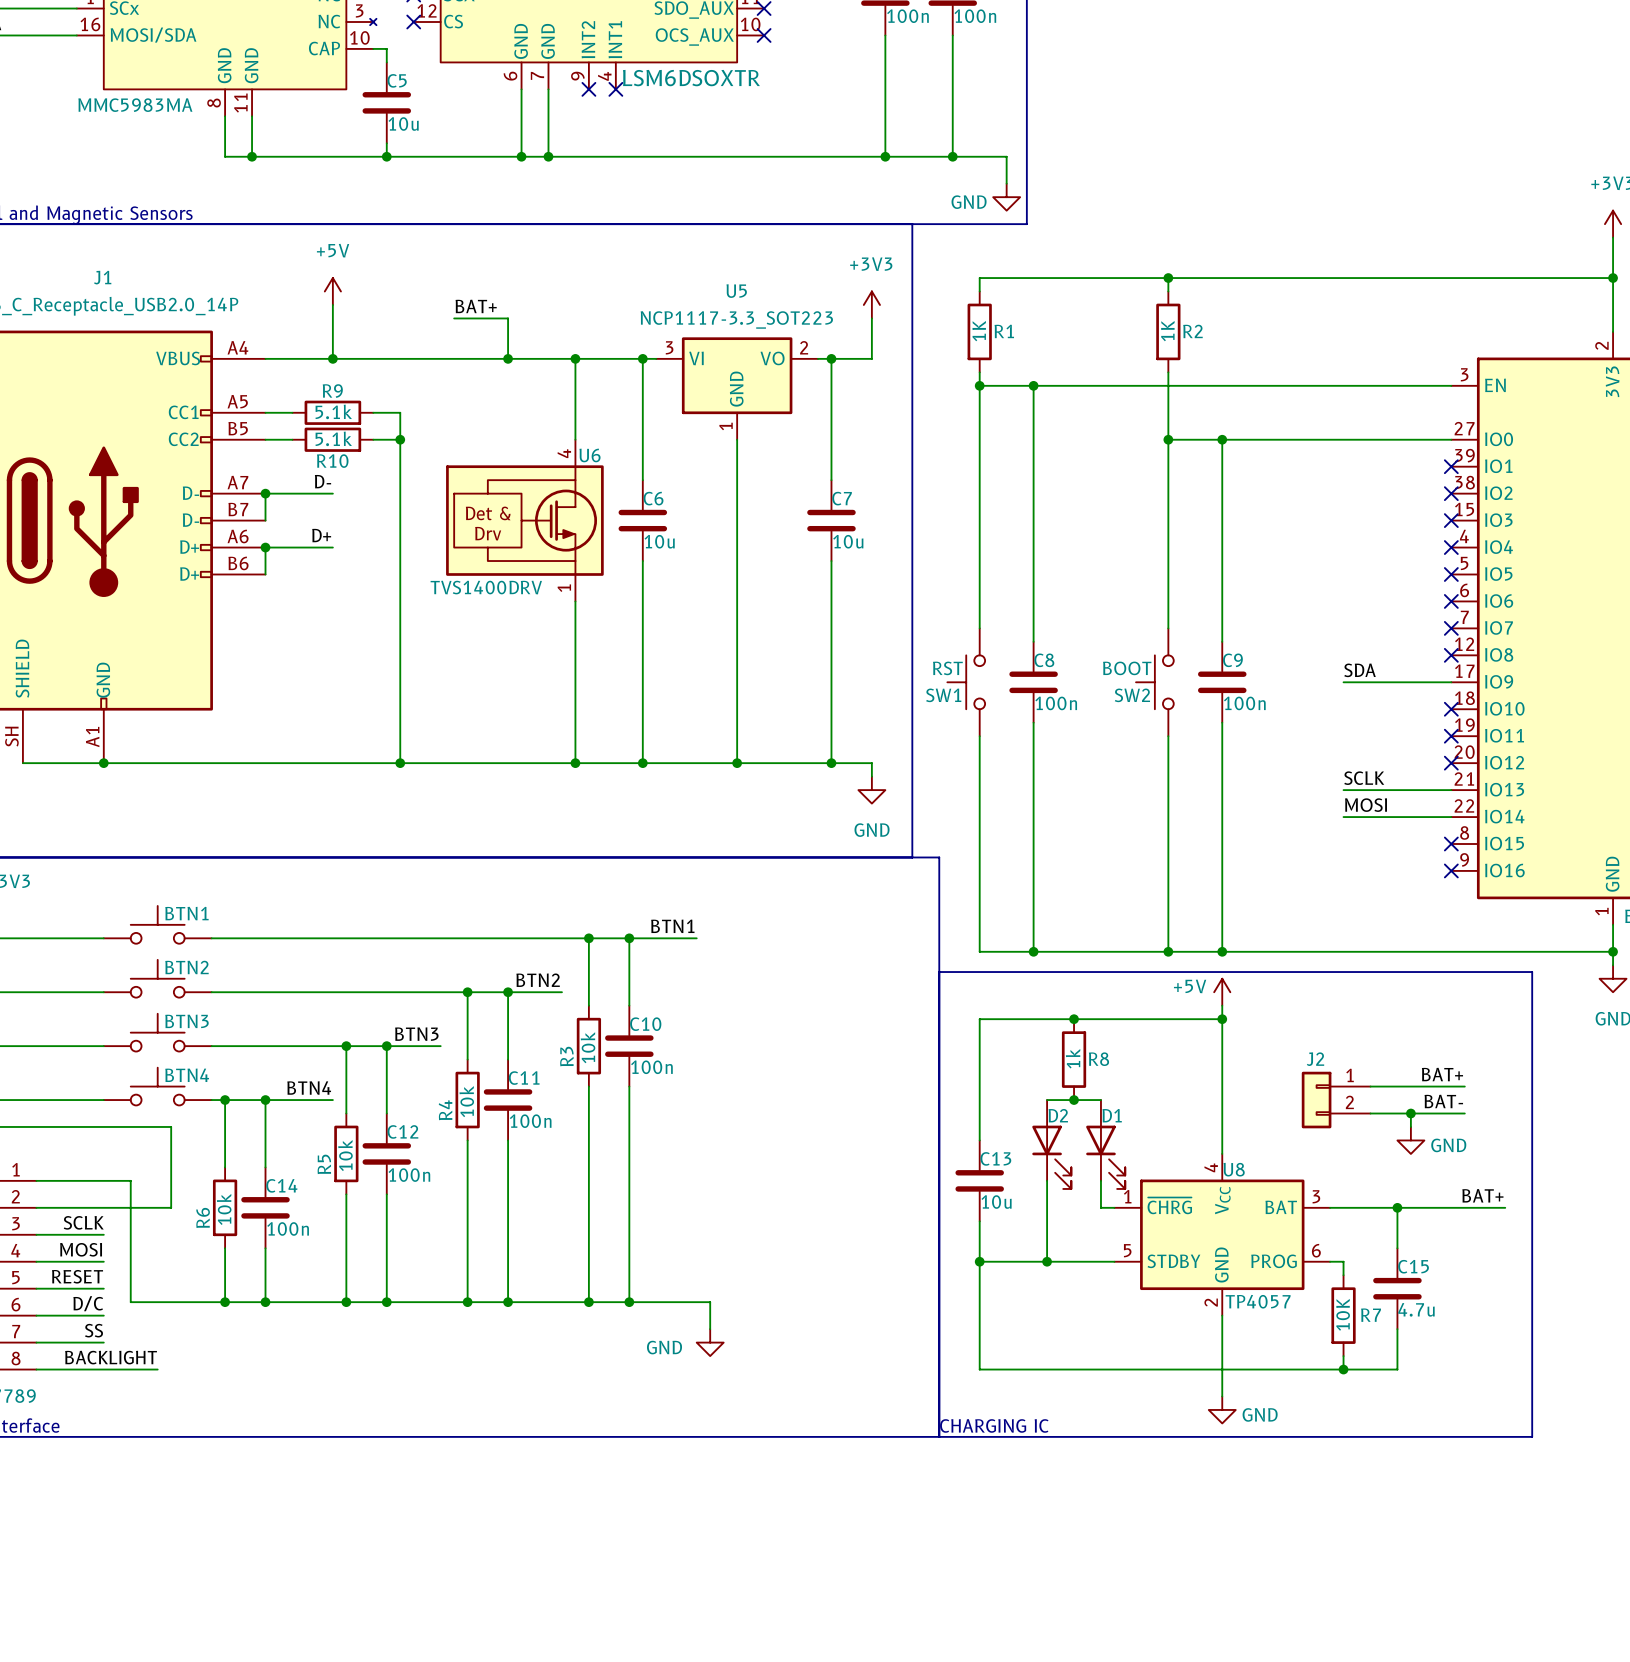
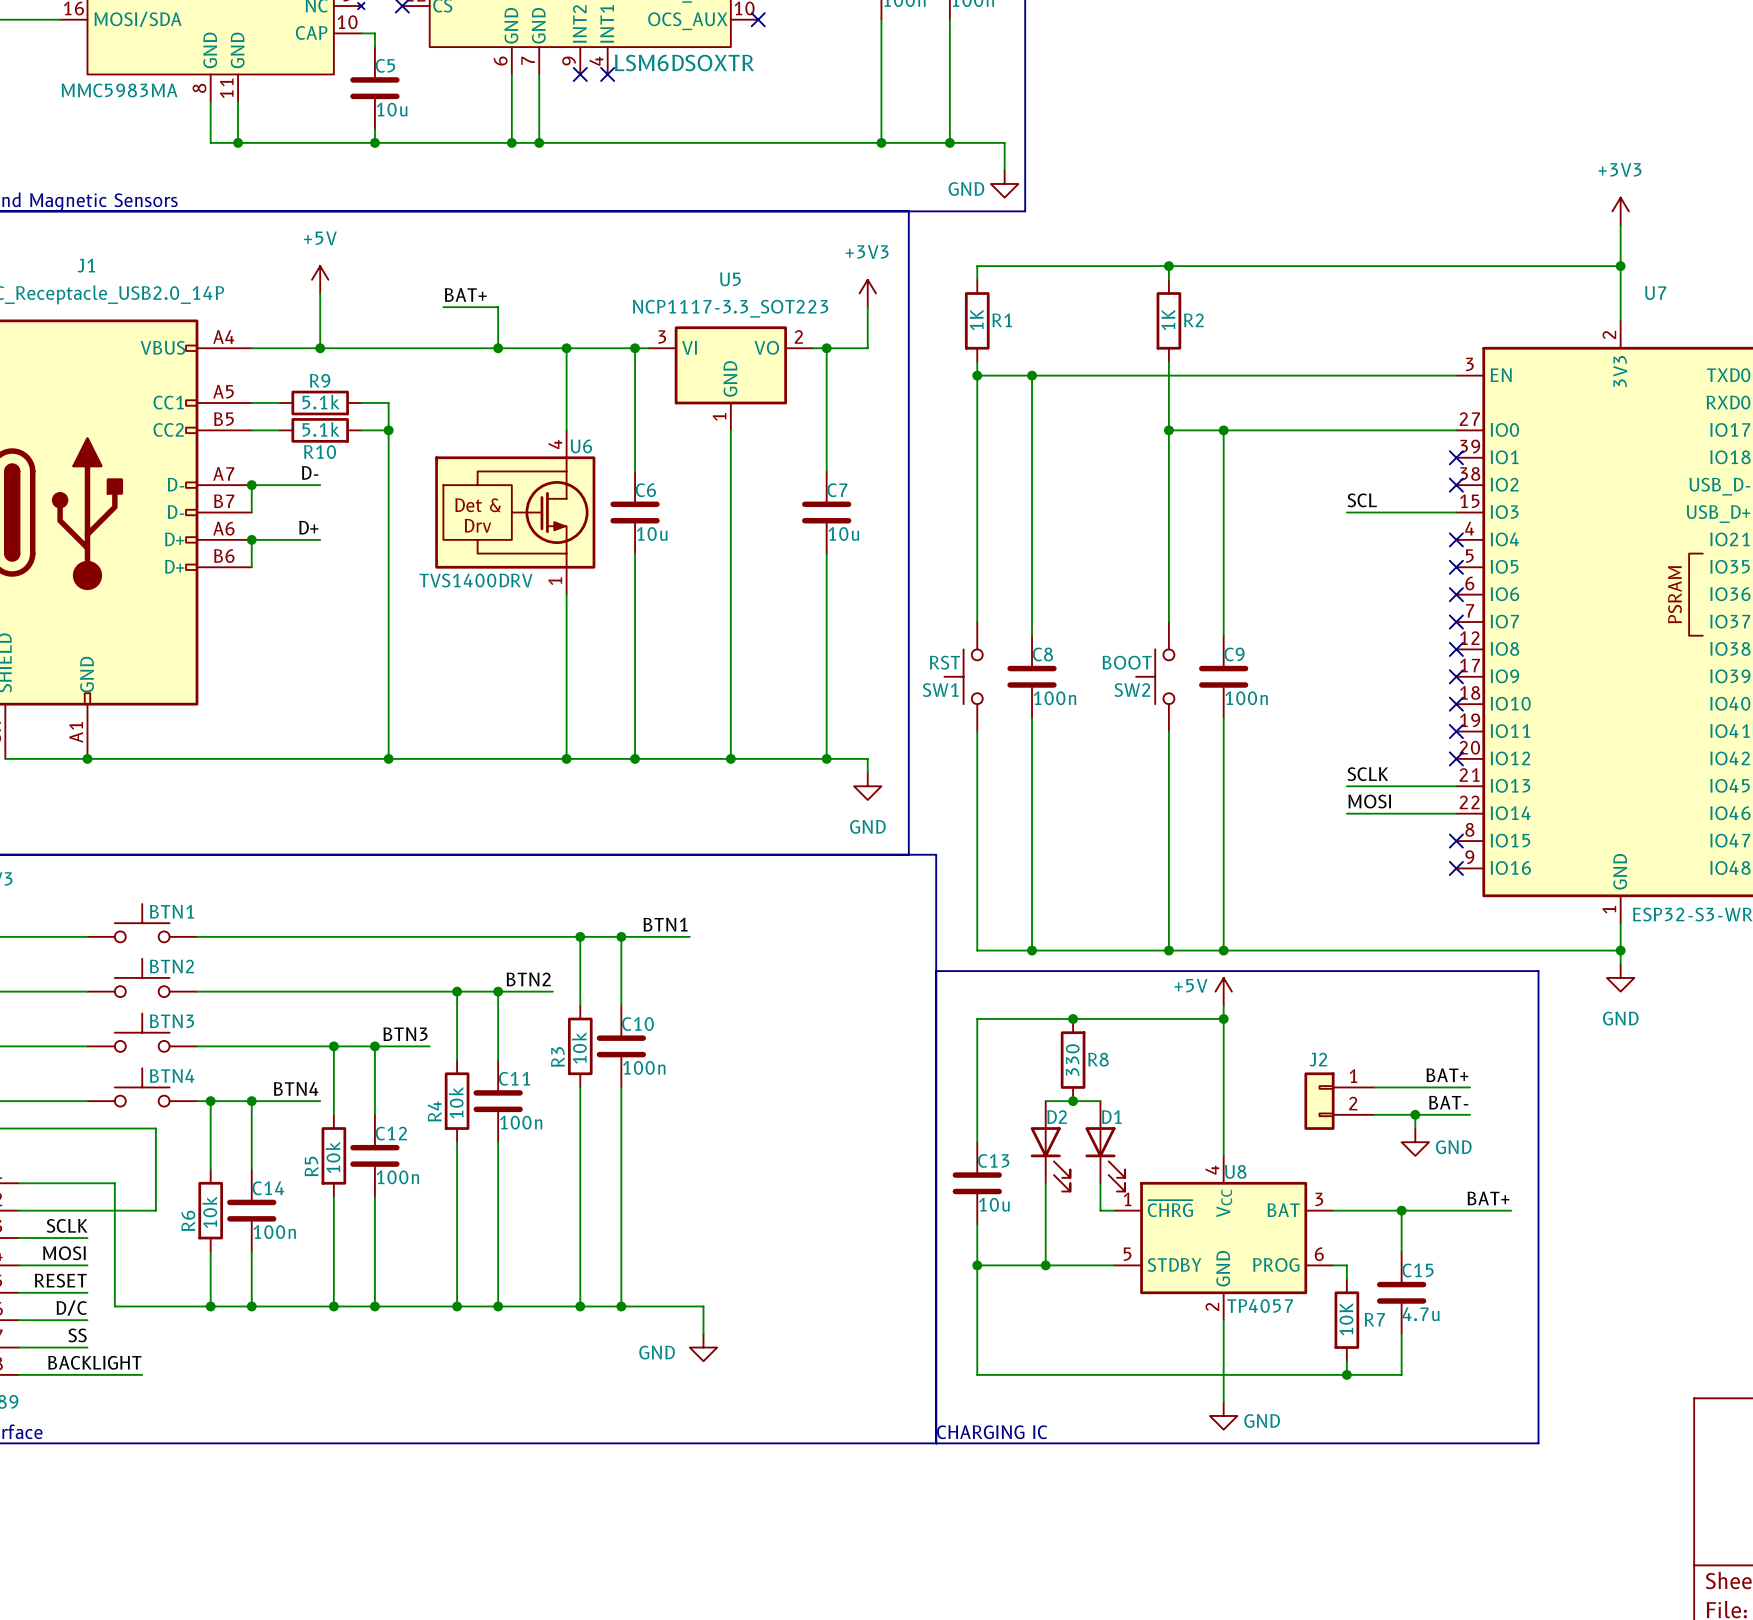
label: none -> SCL (1362, 500)
no-connect mark: (1451, 520) -> none
label: SDA (1360, 670) -> none
wire: (1343, 682) (1451, 682) -> (1346, 512) (1456, 512)
no-connect mark: none -> (1456, 676)
R8 value: 1k (1073, 1058) -> 330 (1072, 1060)

